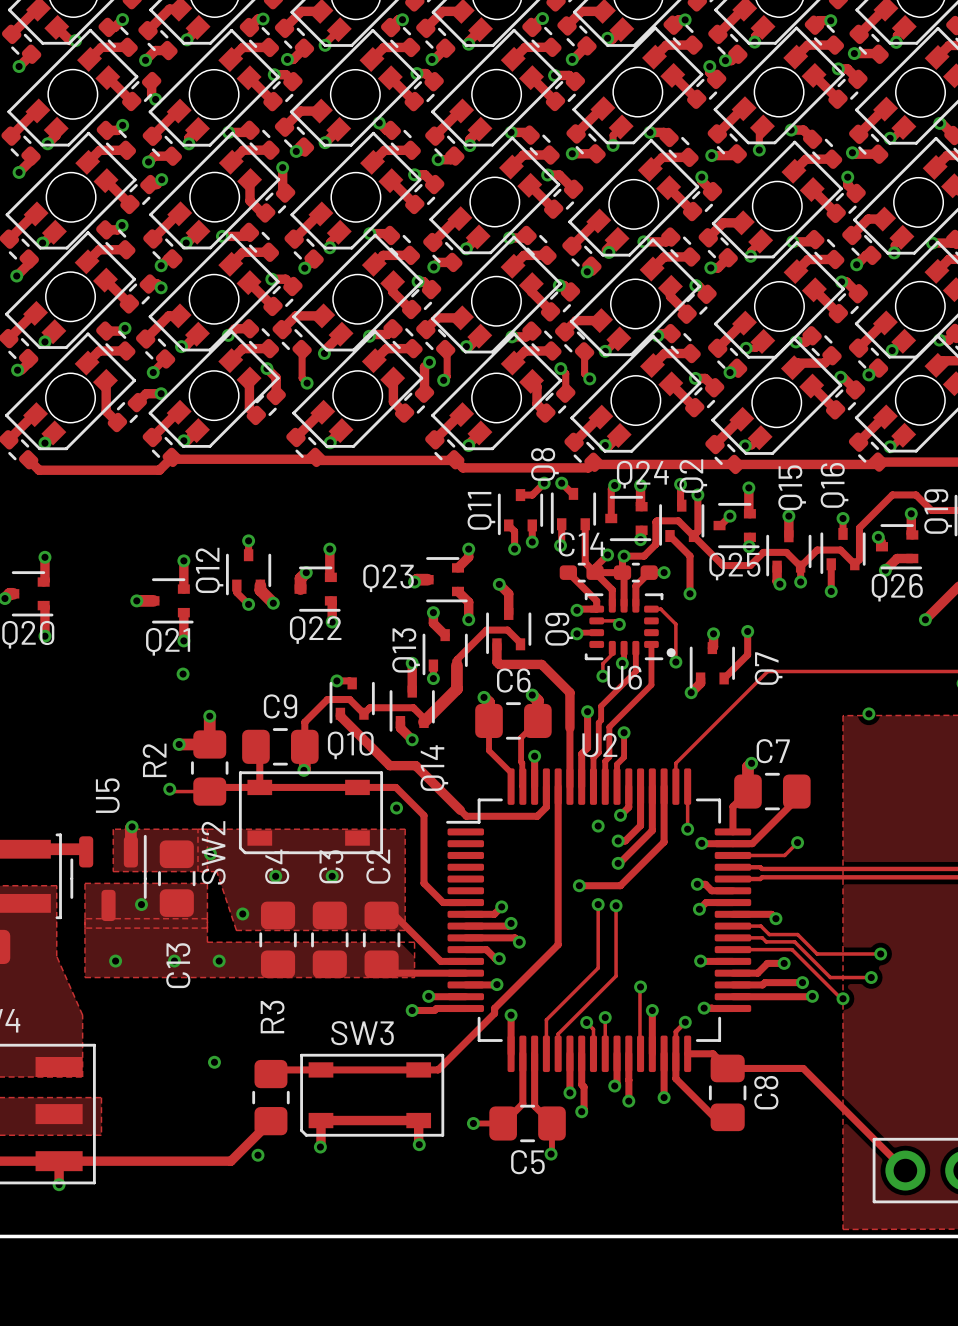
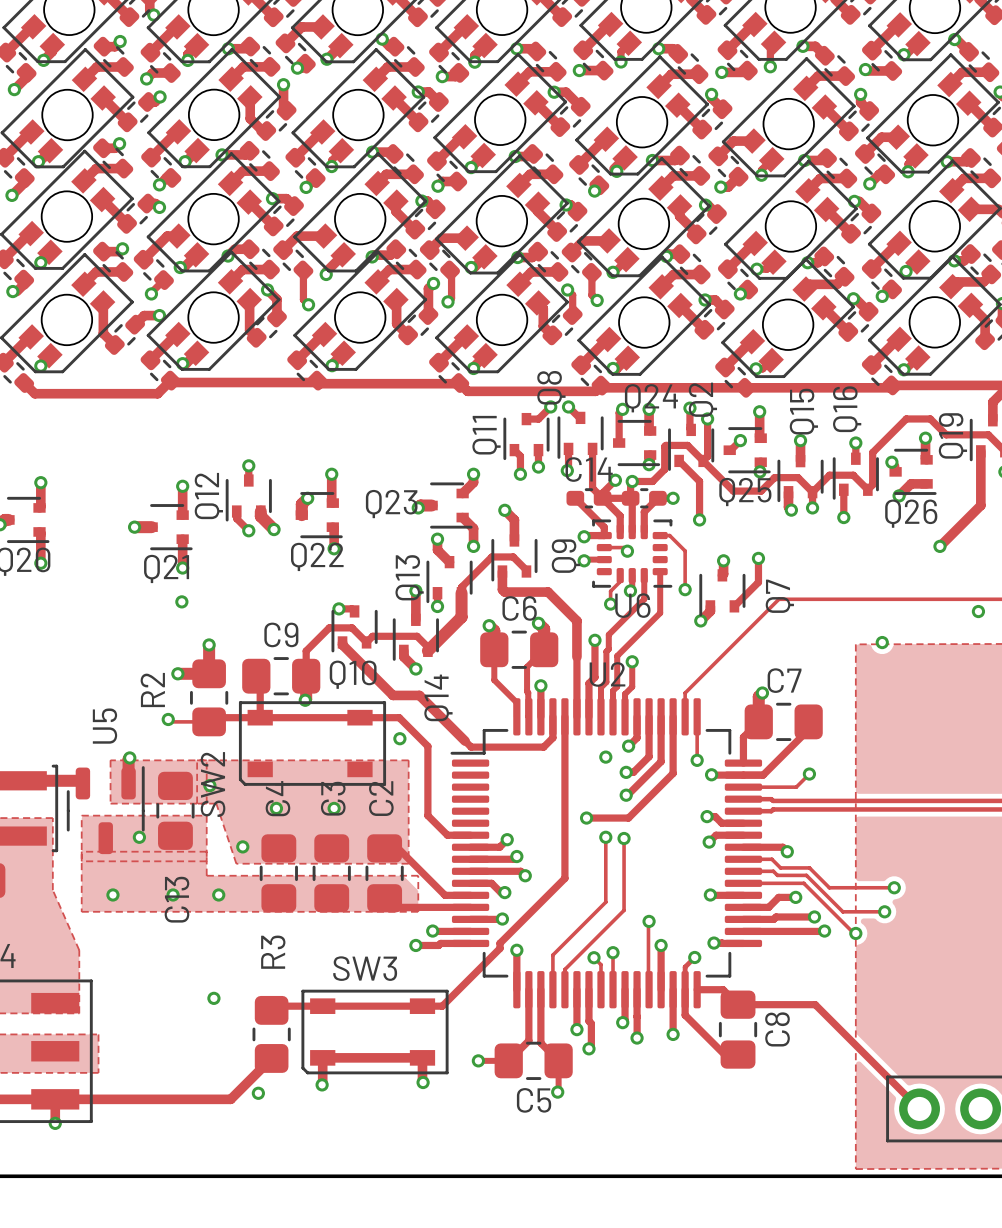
U6 footprint: [584, 593, 676, 661] -> [592, 519, 673, 588]

